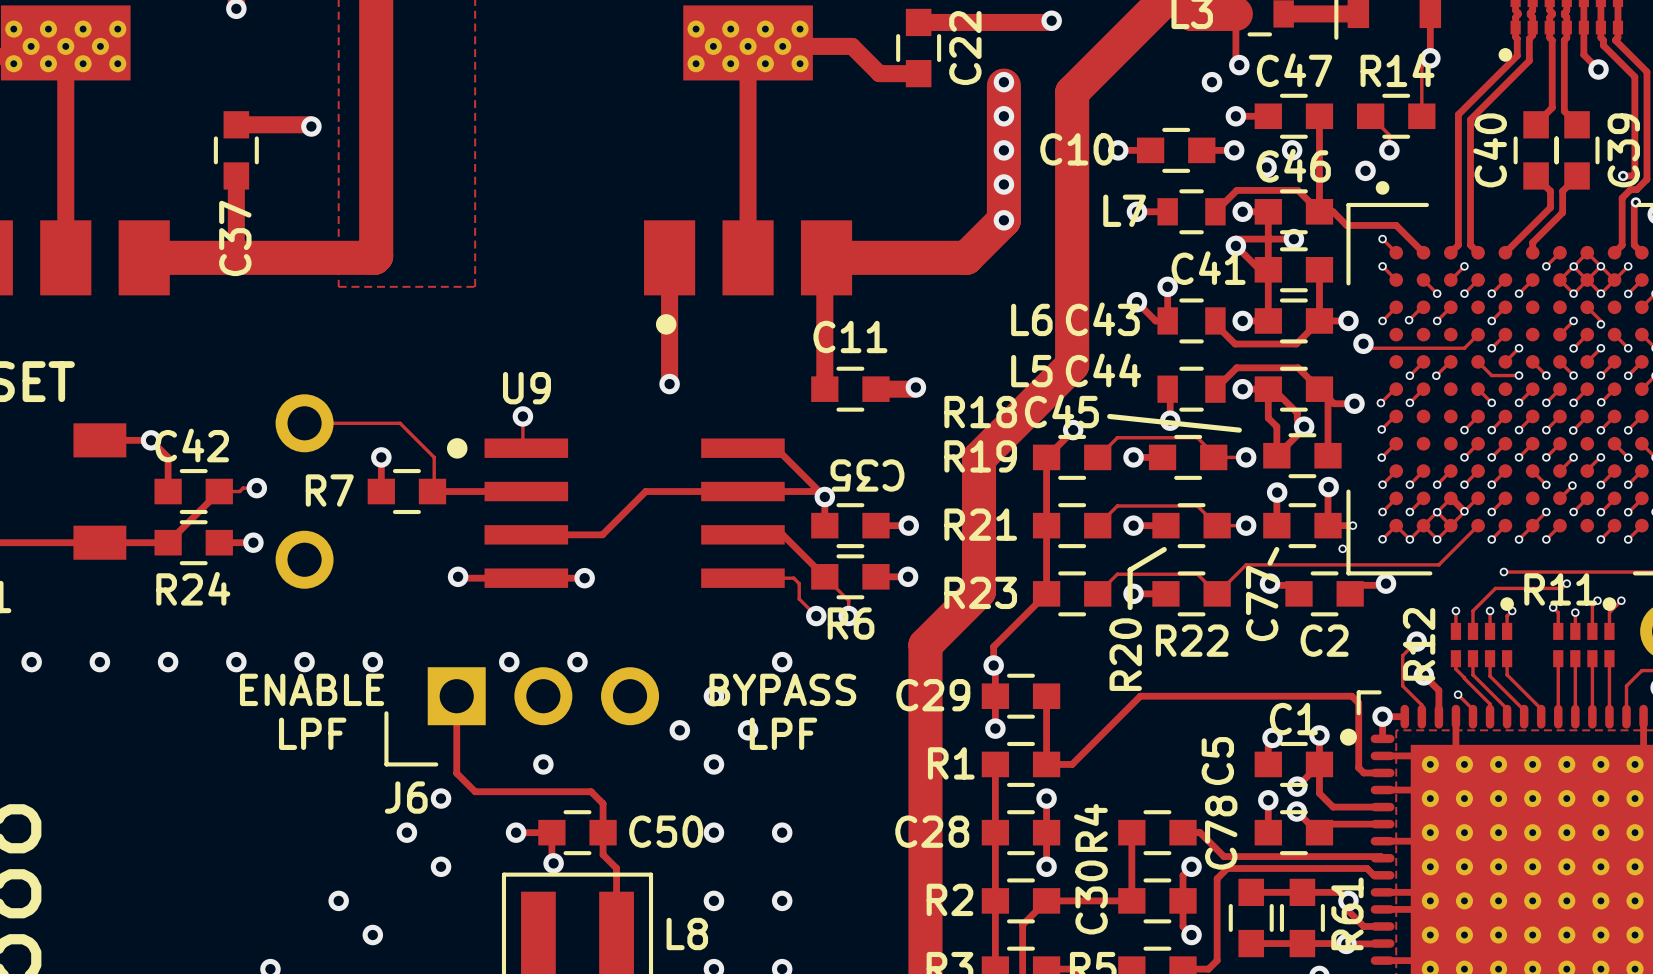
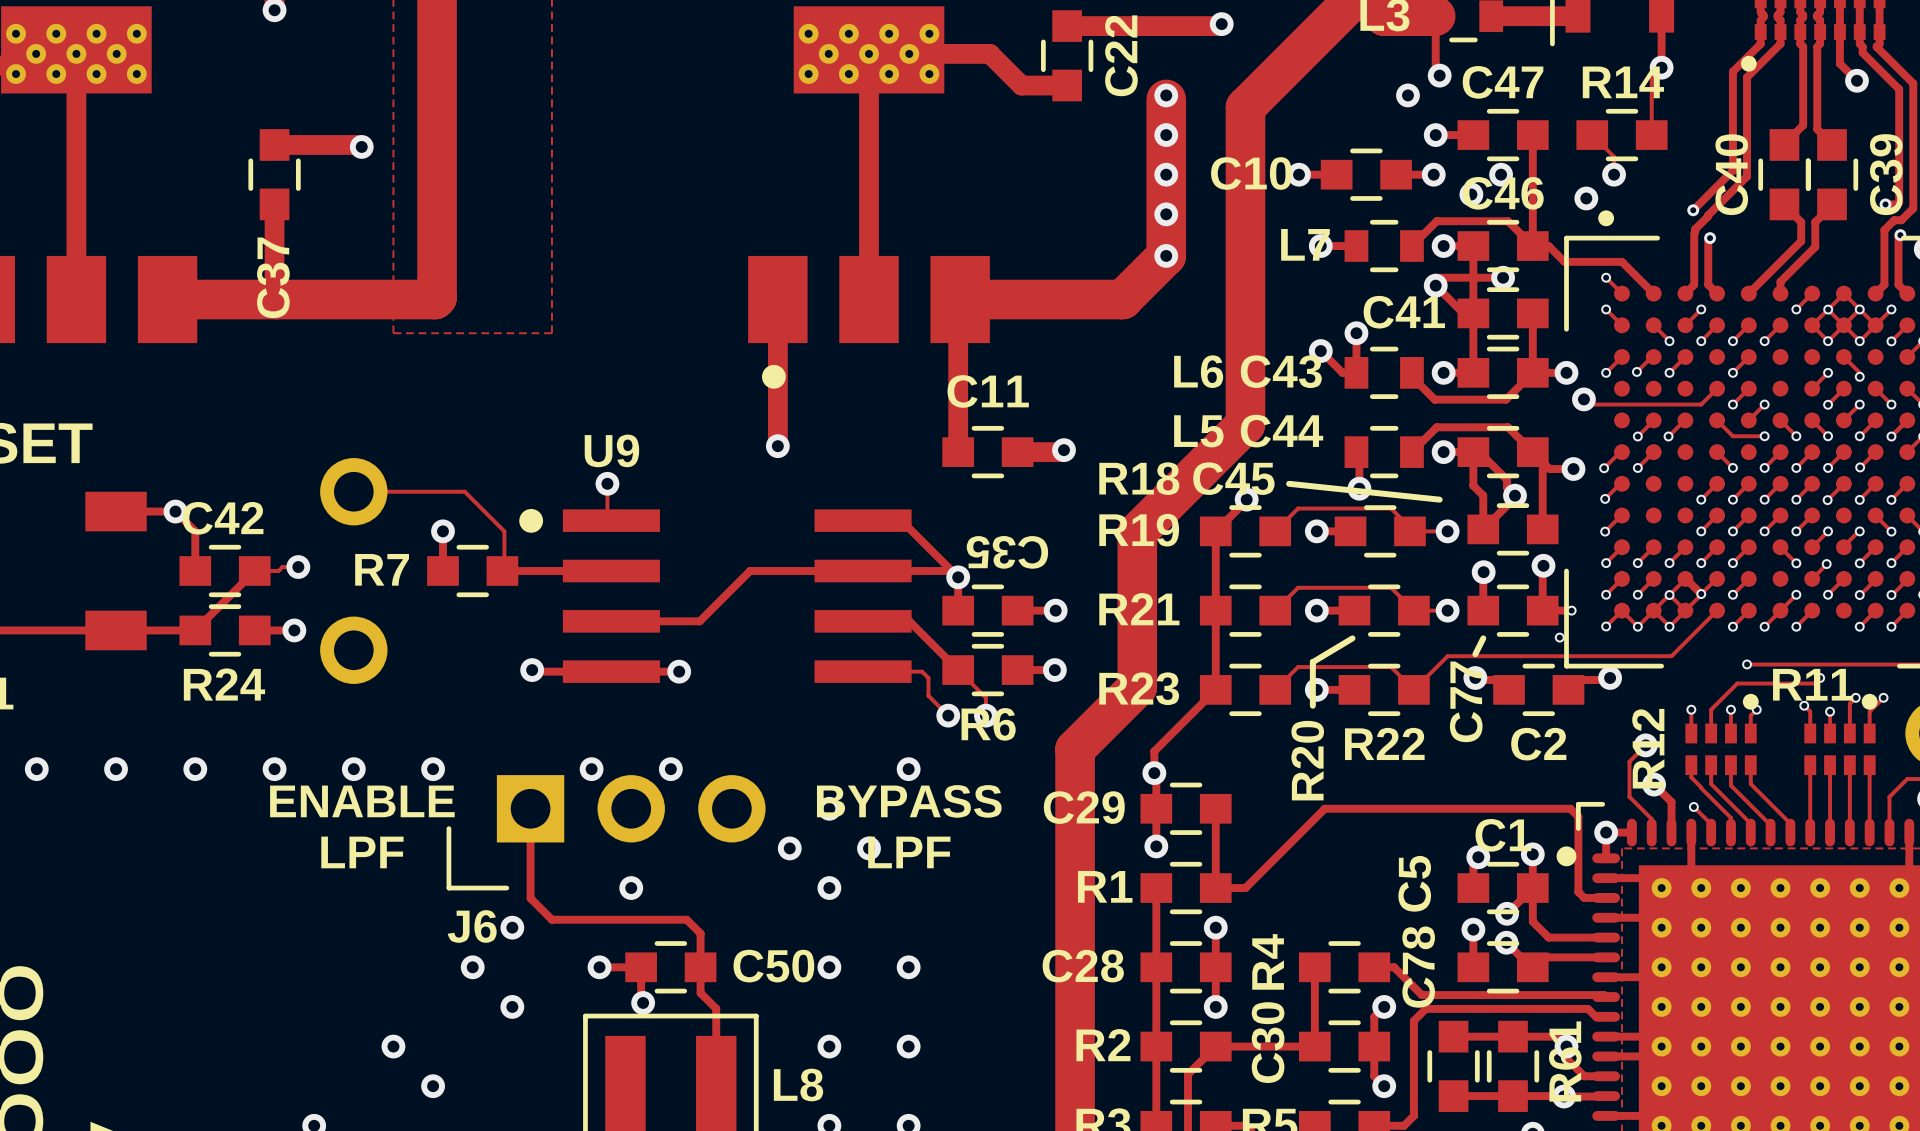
track: (1532, 35) (1529, 38) (1529, 60) (1470, 119) (1470, 206) -> (1780, 41) (1780, 43) (1747, 77) (1747, 176) (1708, 215) (1695, 229) (1695, 232)
track: (1515, 37) (1517, 55) (1458, 114) (1458, 200) -> (1760, 43) (1732, 71) (1732, 170) (1693, 210)
via: none -> (1693, 210)
via: none -> (1710, 238)

